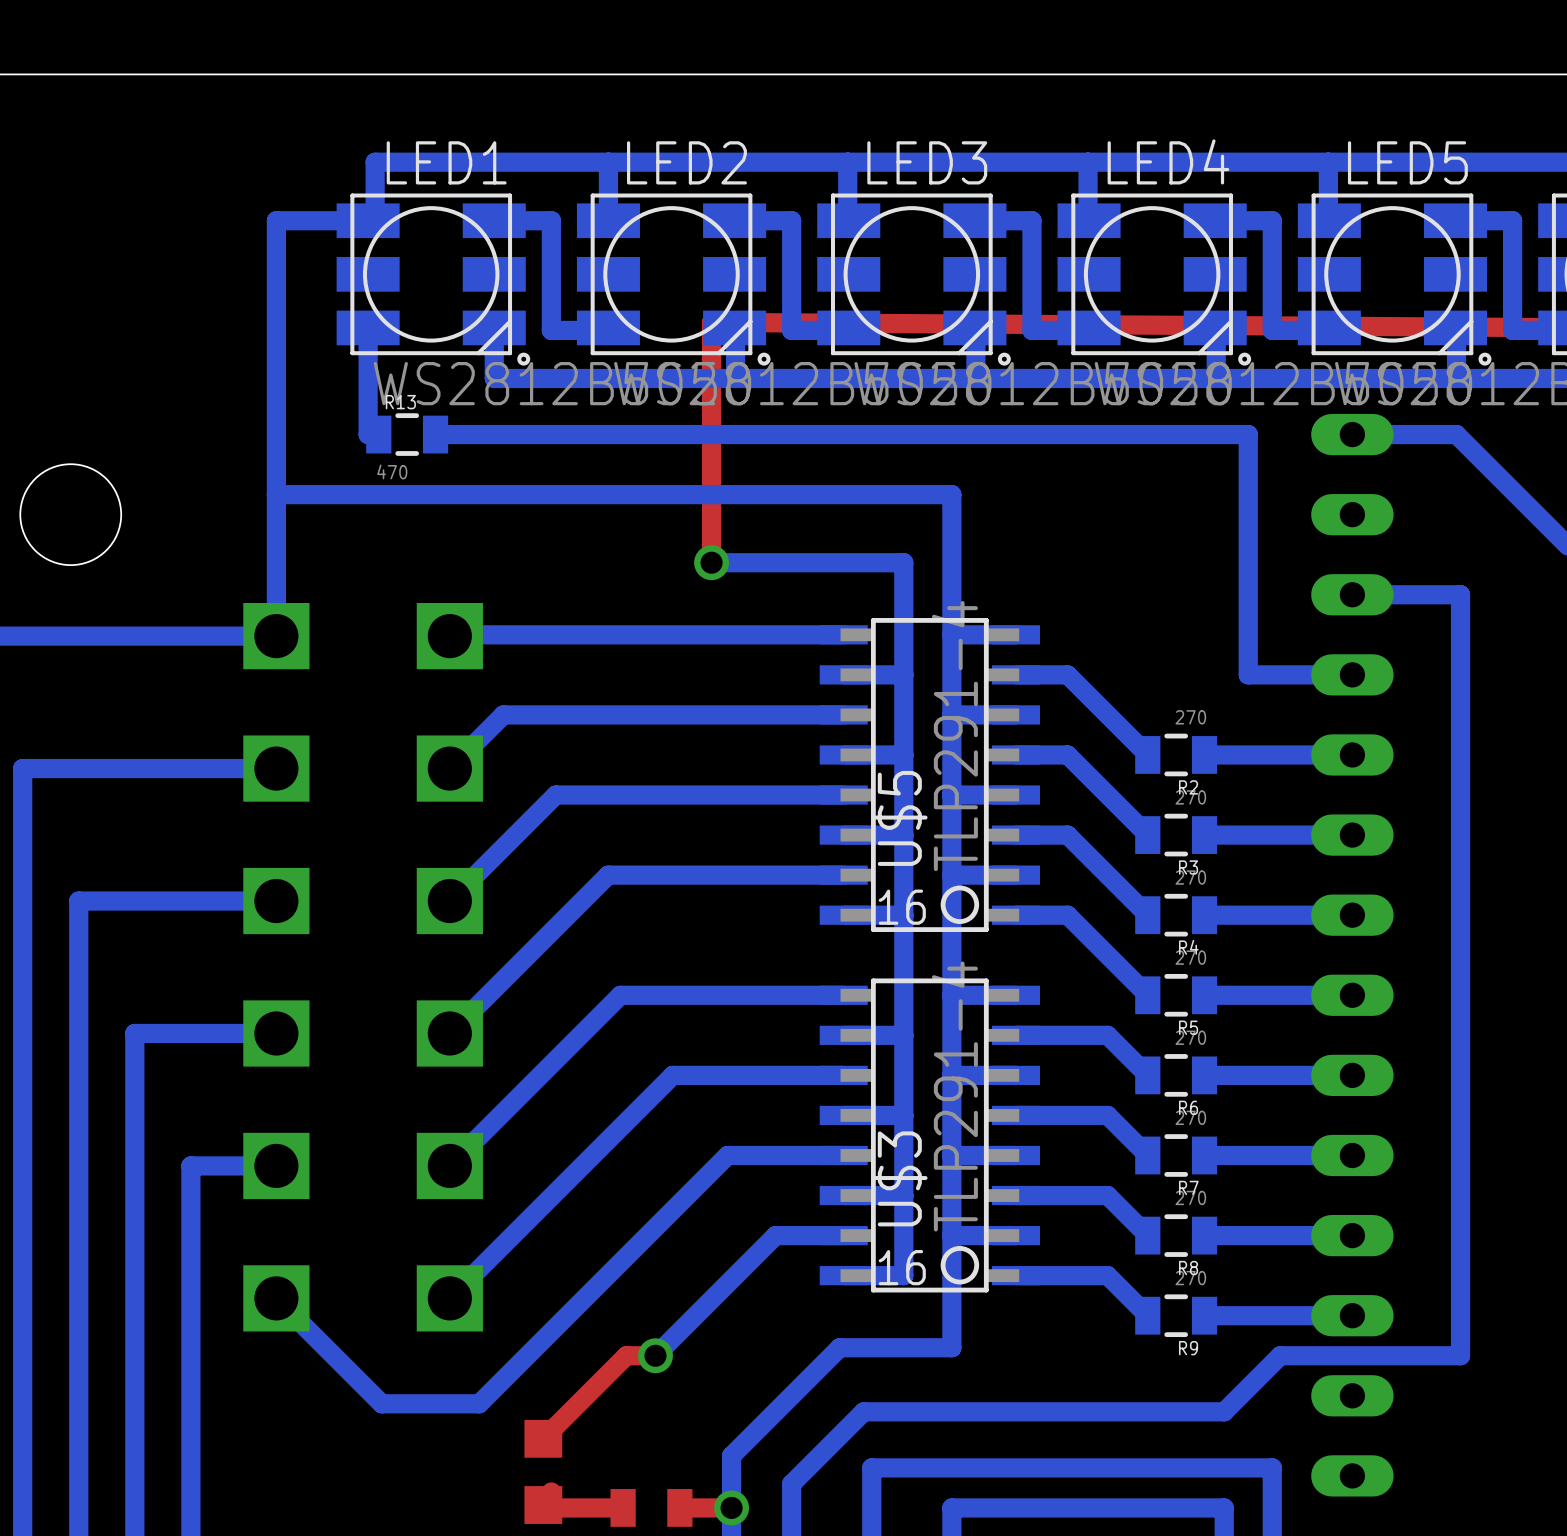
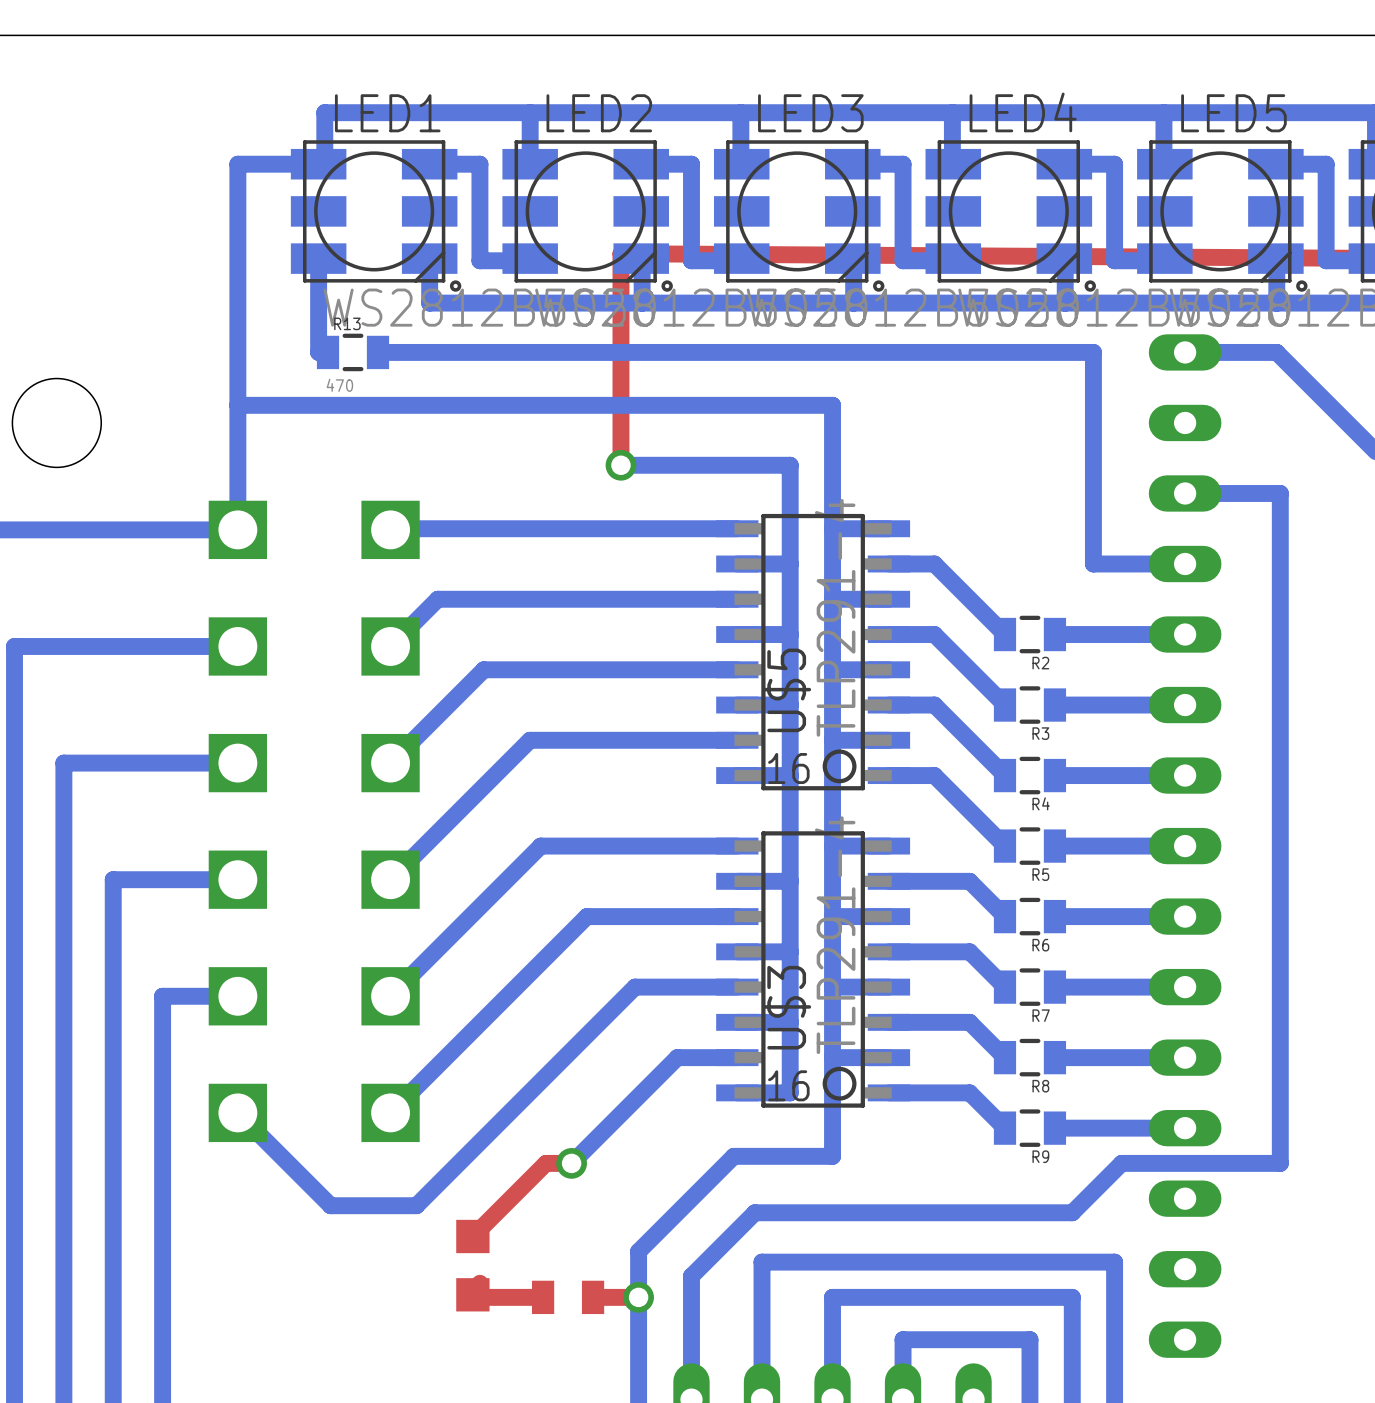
R2 value: 270 (1190, 717) -> none
R3 value: 270 (1190, 797) -> none
R4 value: 270 (1190, 877) -> none
R5 value: 270 (1190, 957) -> none
R6 value: 270 (1190, 1037) -> none
R7 value: 270 (1190, 1117) -> none
R8 value: 270 (1190, 1197) -> none
R9 value: 270 (1190, 1278) -> none

